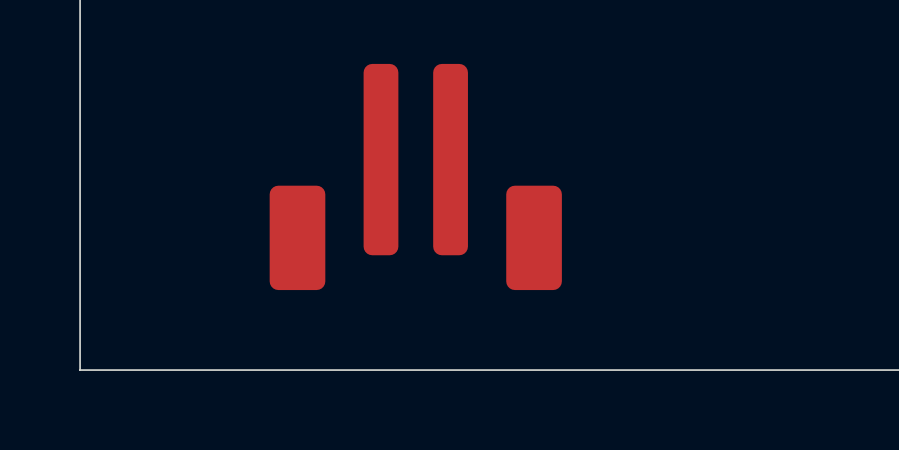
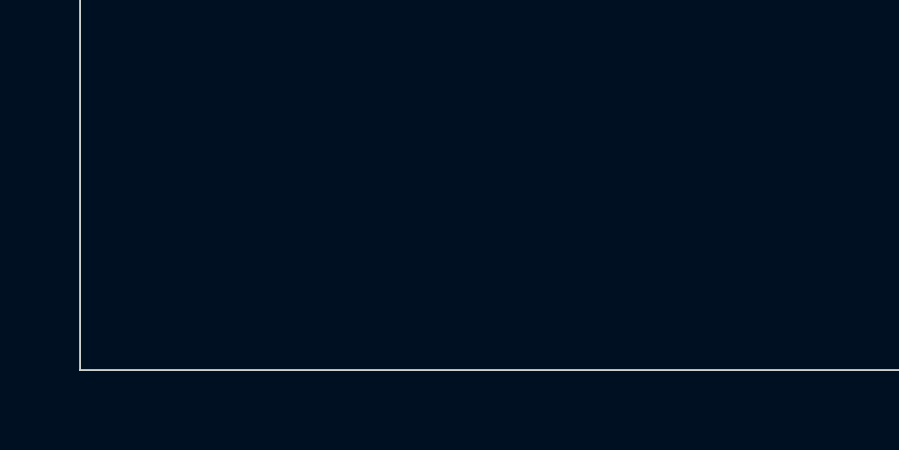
part: (415, 176) -> none

